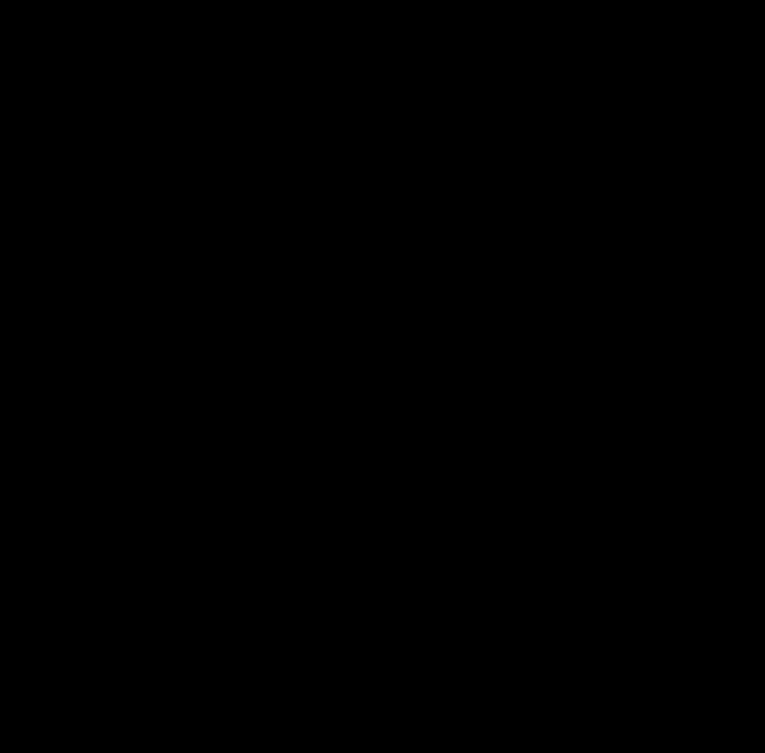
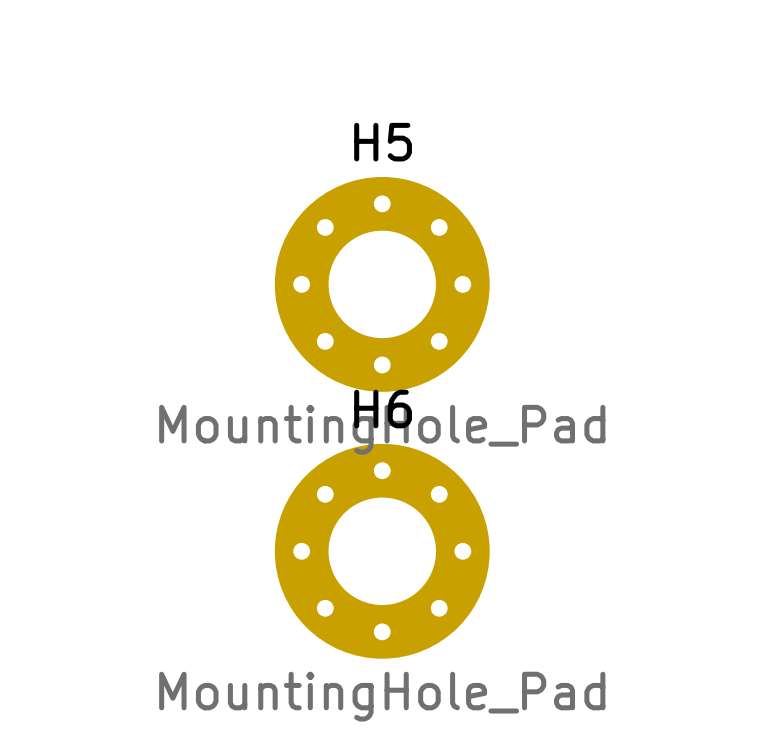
H5: none -> MountingHole_Pad (382, 284)
H6: none -> MountingHole_Pad (382, 551)

